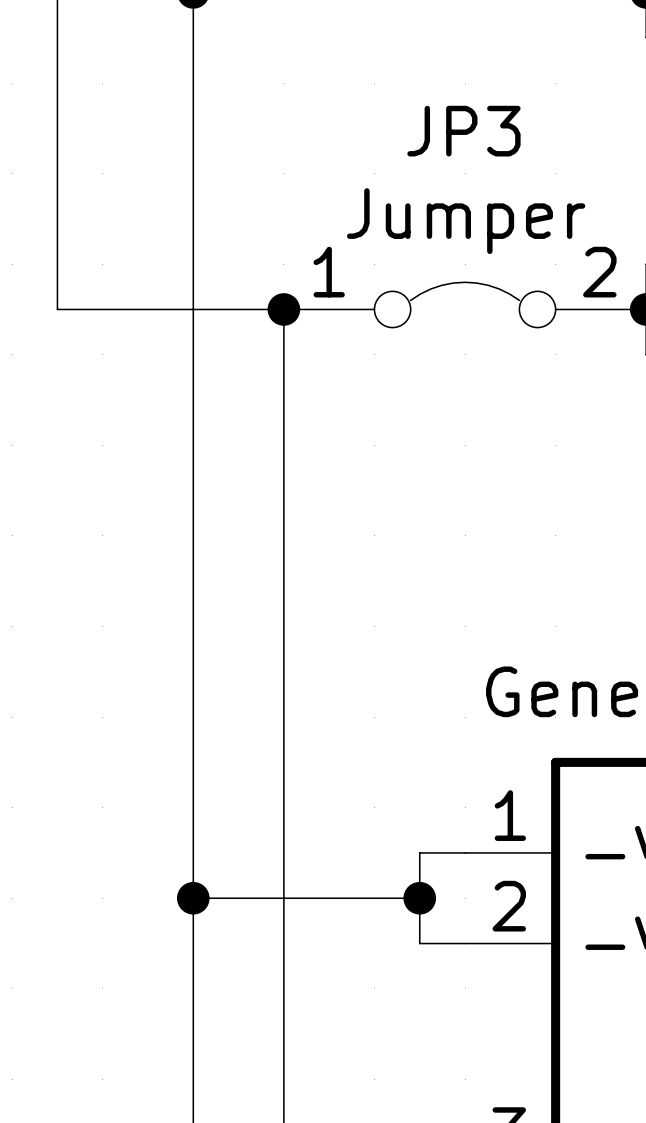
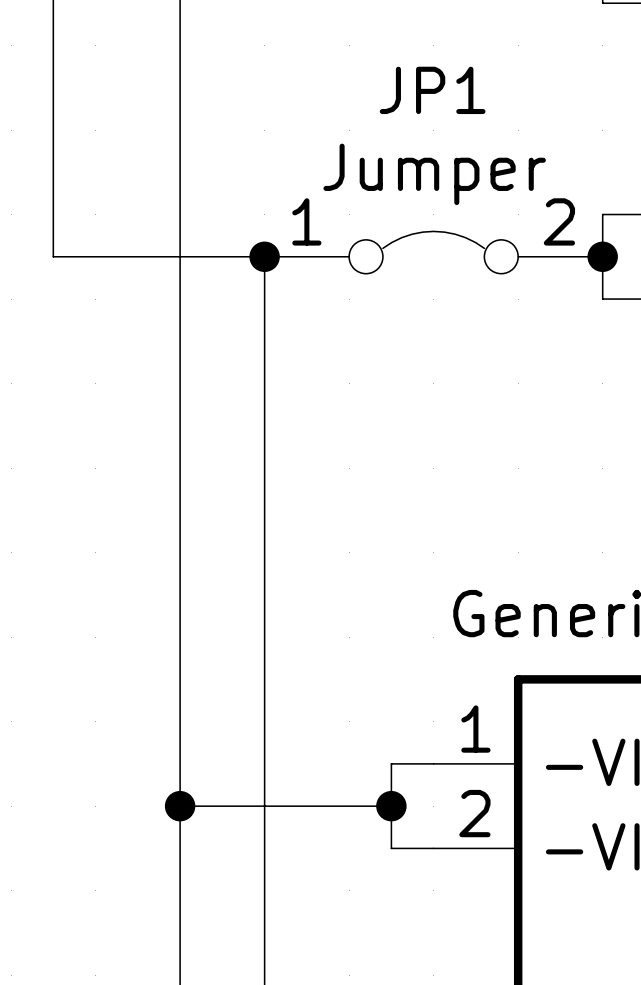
JP3 name: JP3 (463, 131) -> JP1 (432, 90)

